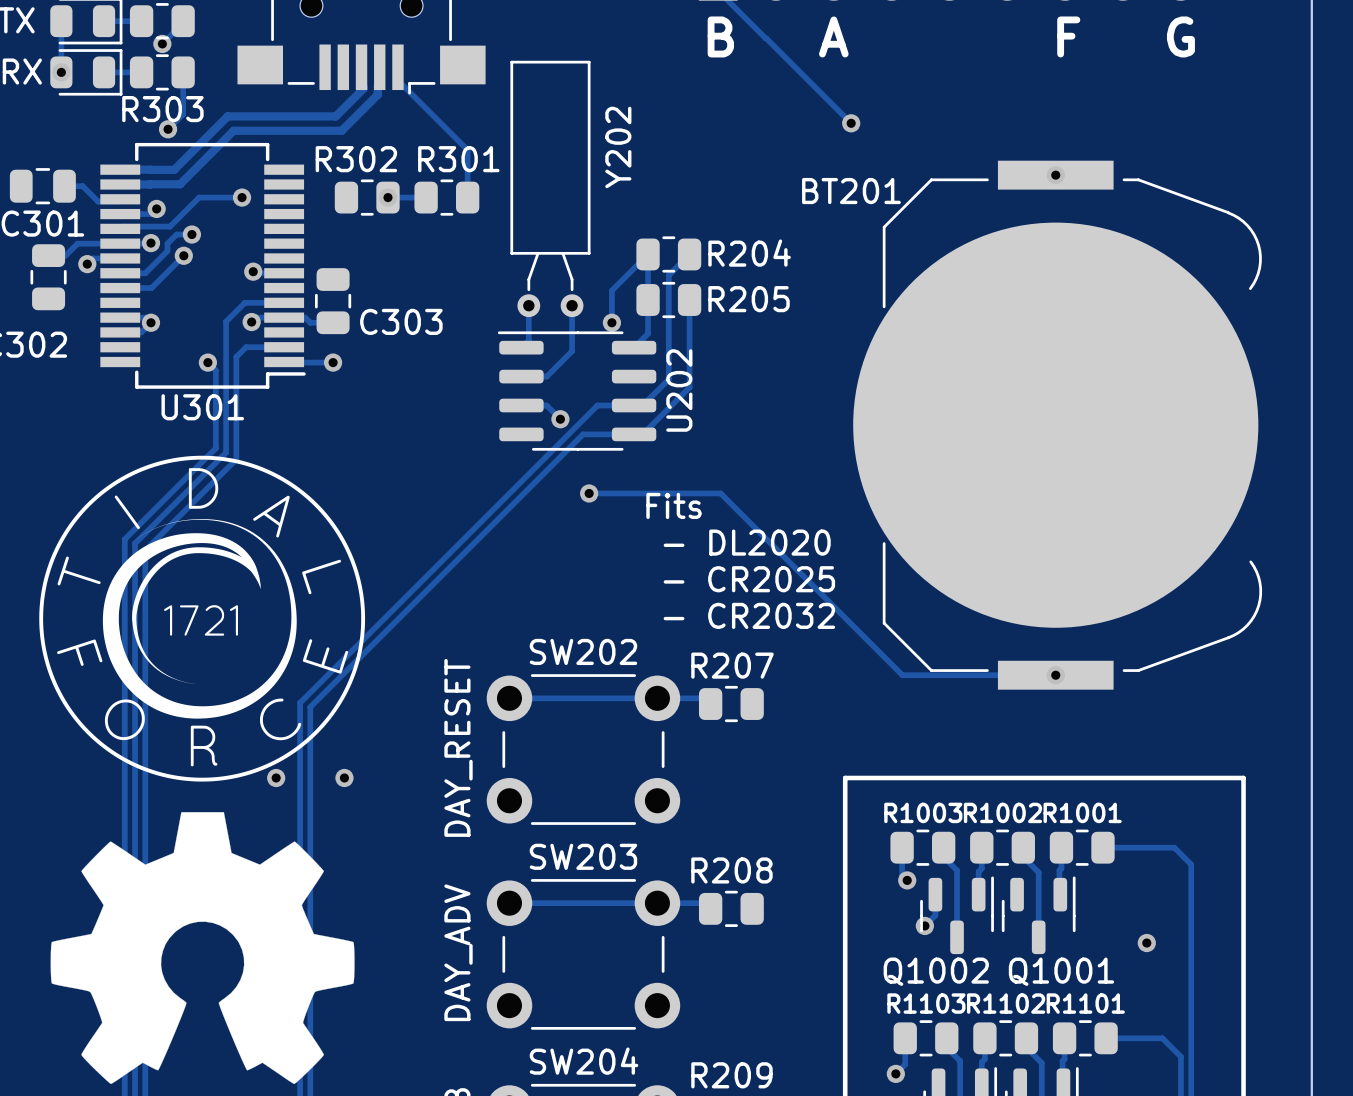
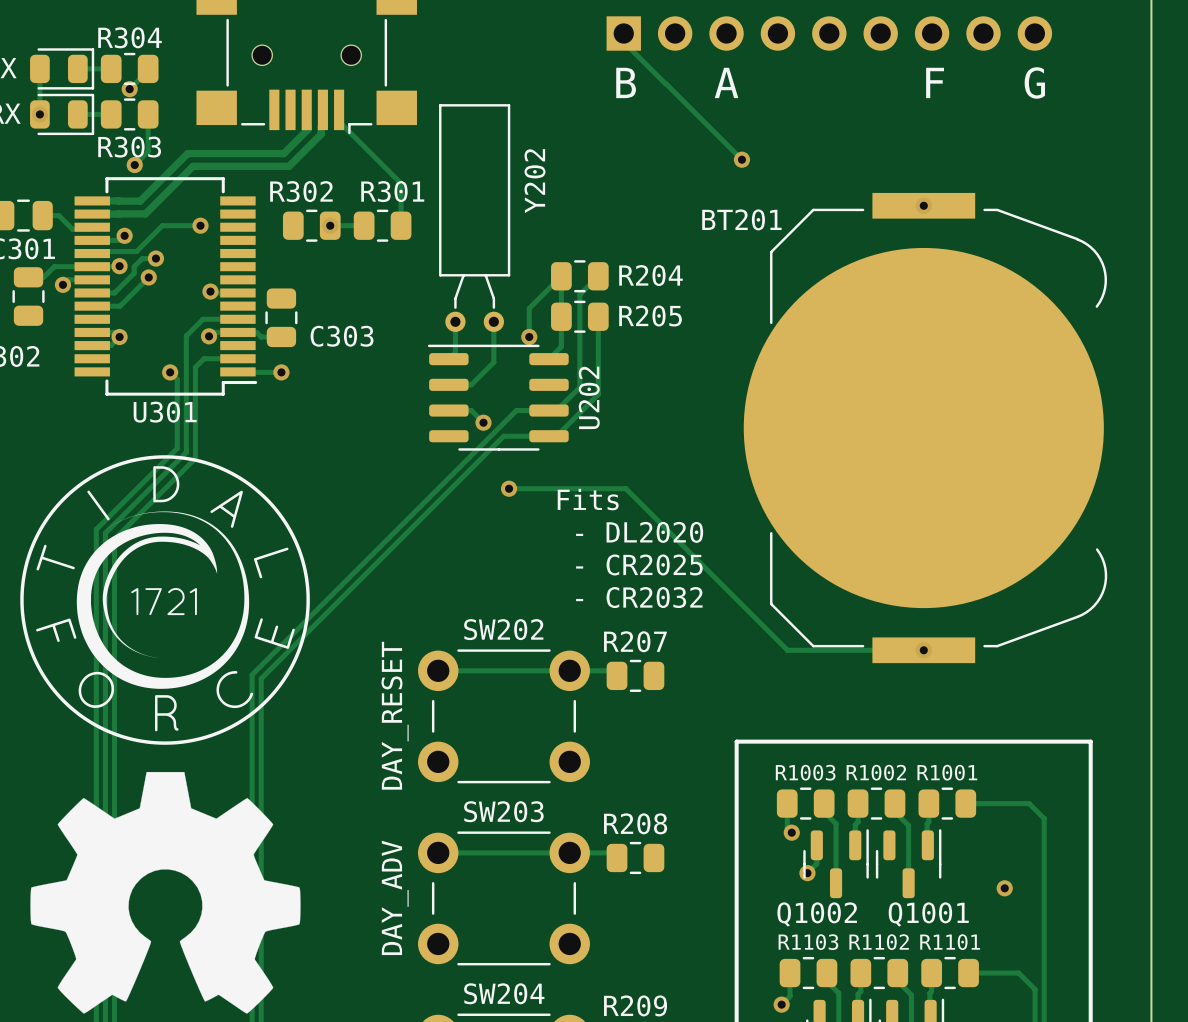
via: (276, 777) -> none
via: (344, 777) -> none

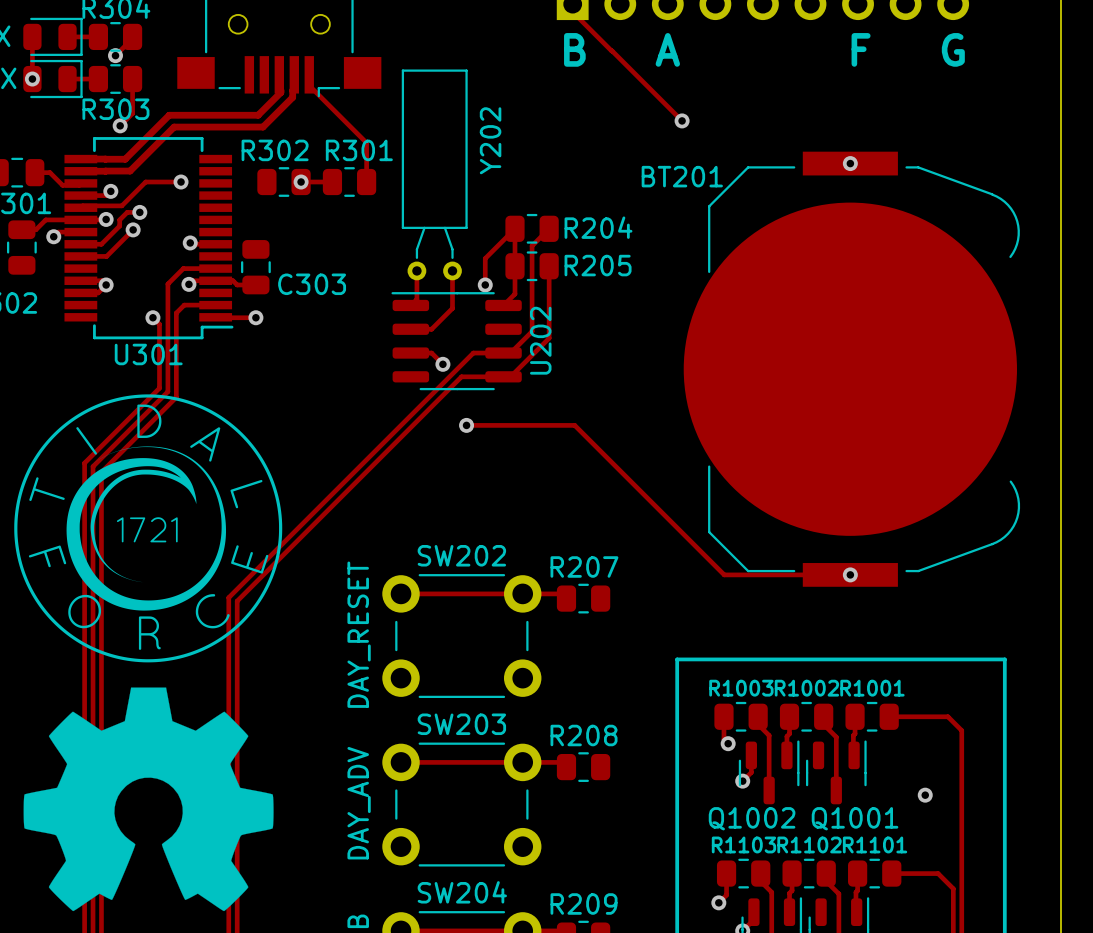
text: Fits (588, 499) -> none
text: - DL2020 (639, 532) -> none
text: - CR2025 (639, 564) -> none
text: - CR2032 (639, 597) -> none

